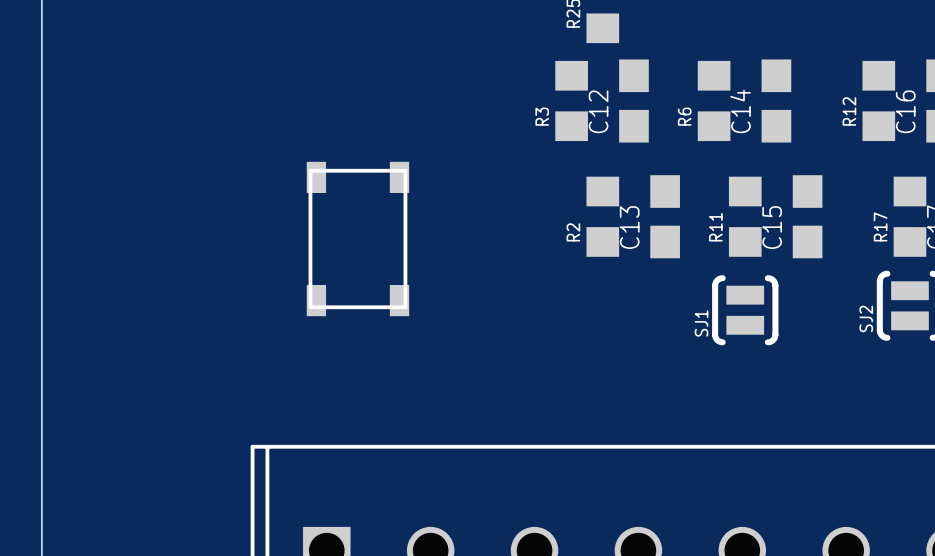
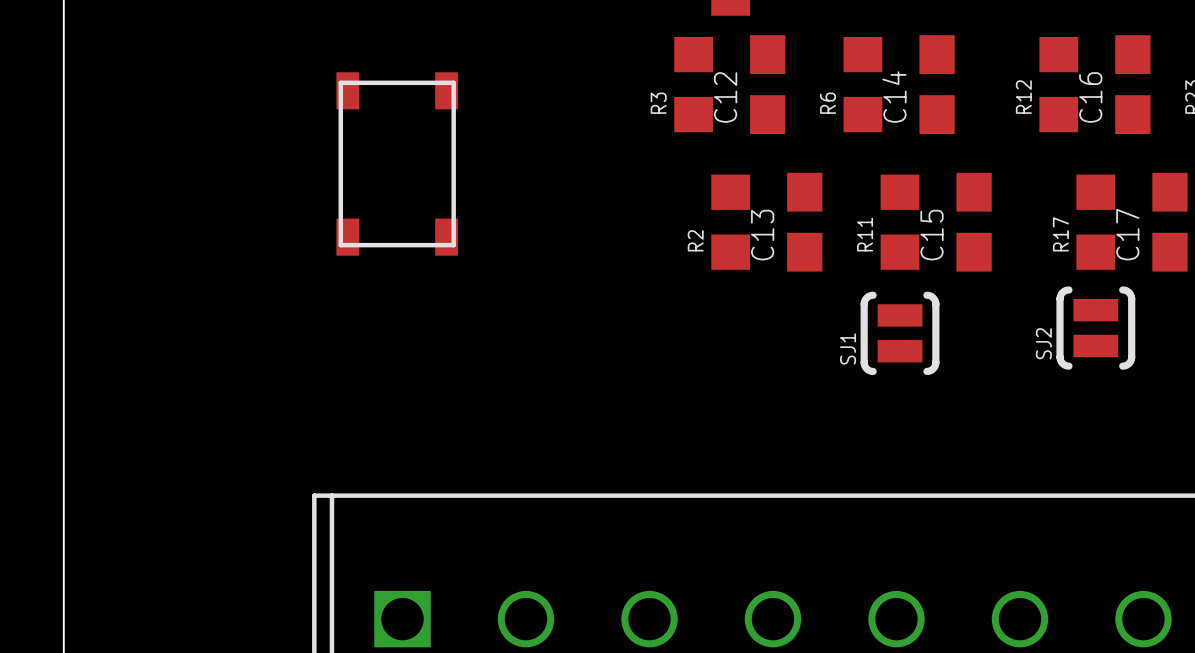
part position: (357, 239) -> (397, 163)

